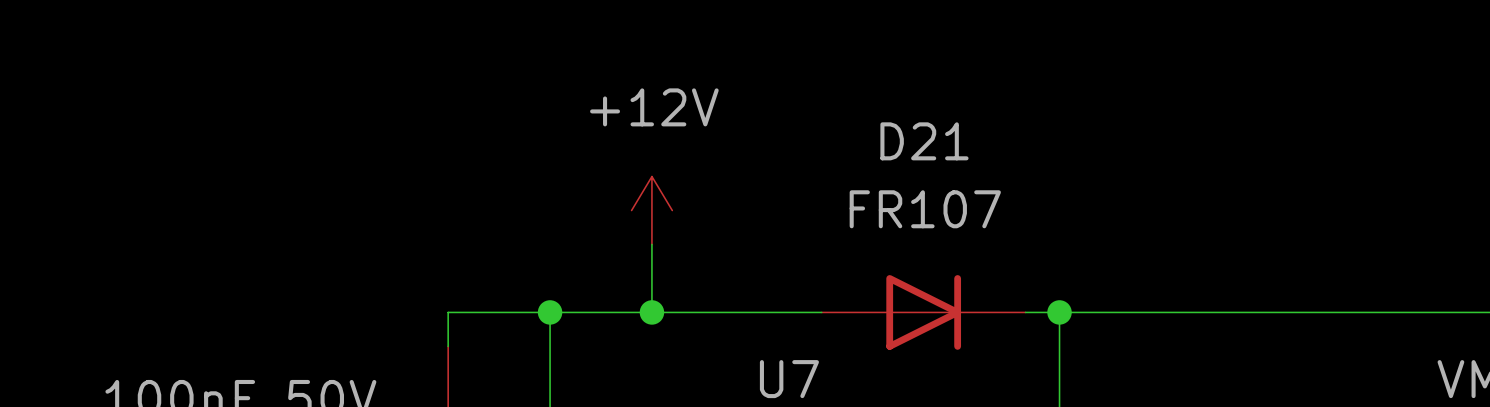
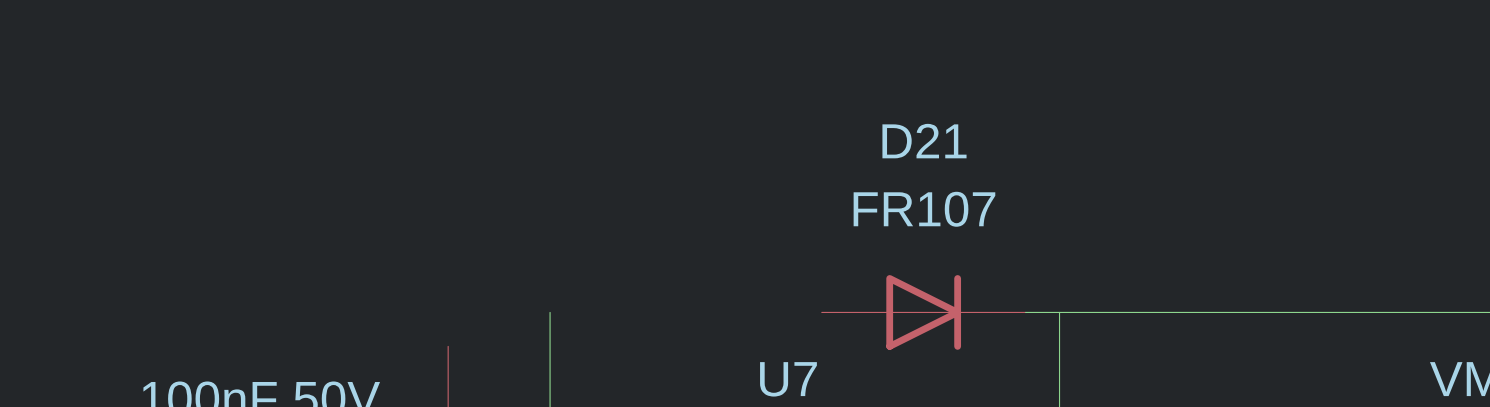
power symbol: +12V (651, 210) -> none
wire: (651, 244) (651, 312) -> none
junction: (550, 312) -> none
junction: (651, 312) -> none
wire: (821, 312) (448, 312) (448, 346) -> none
junction: (1059, 312) -> none

